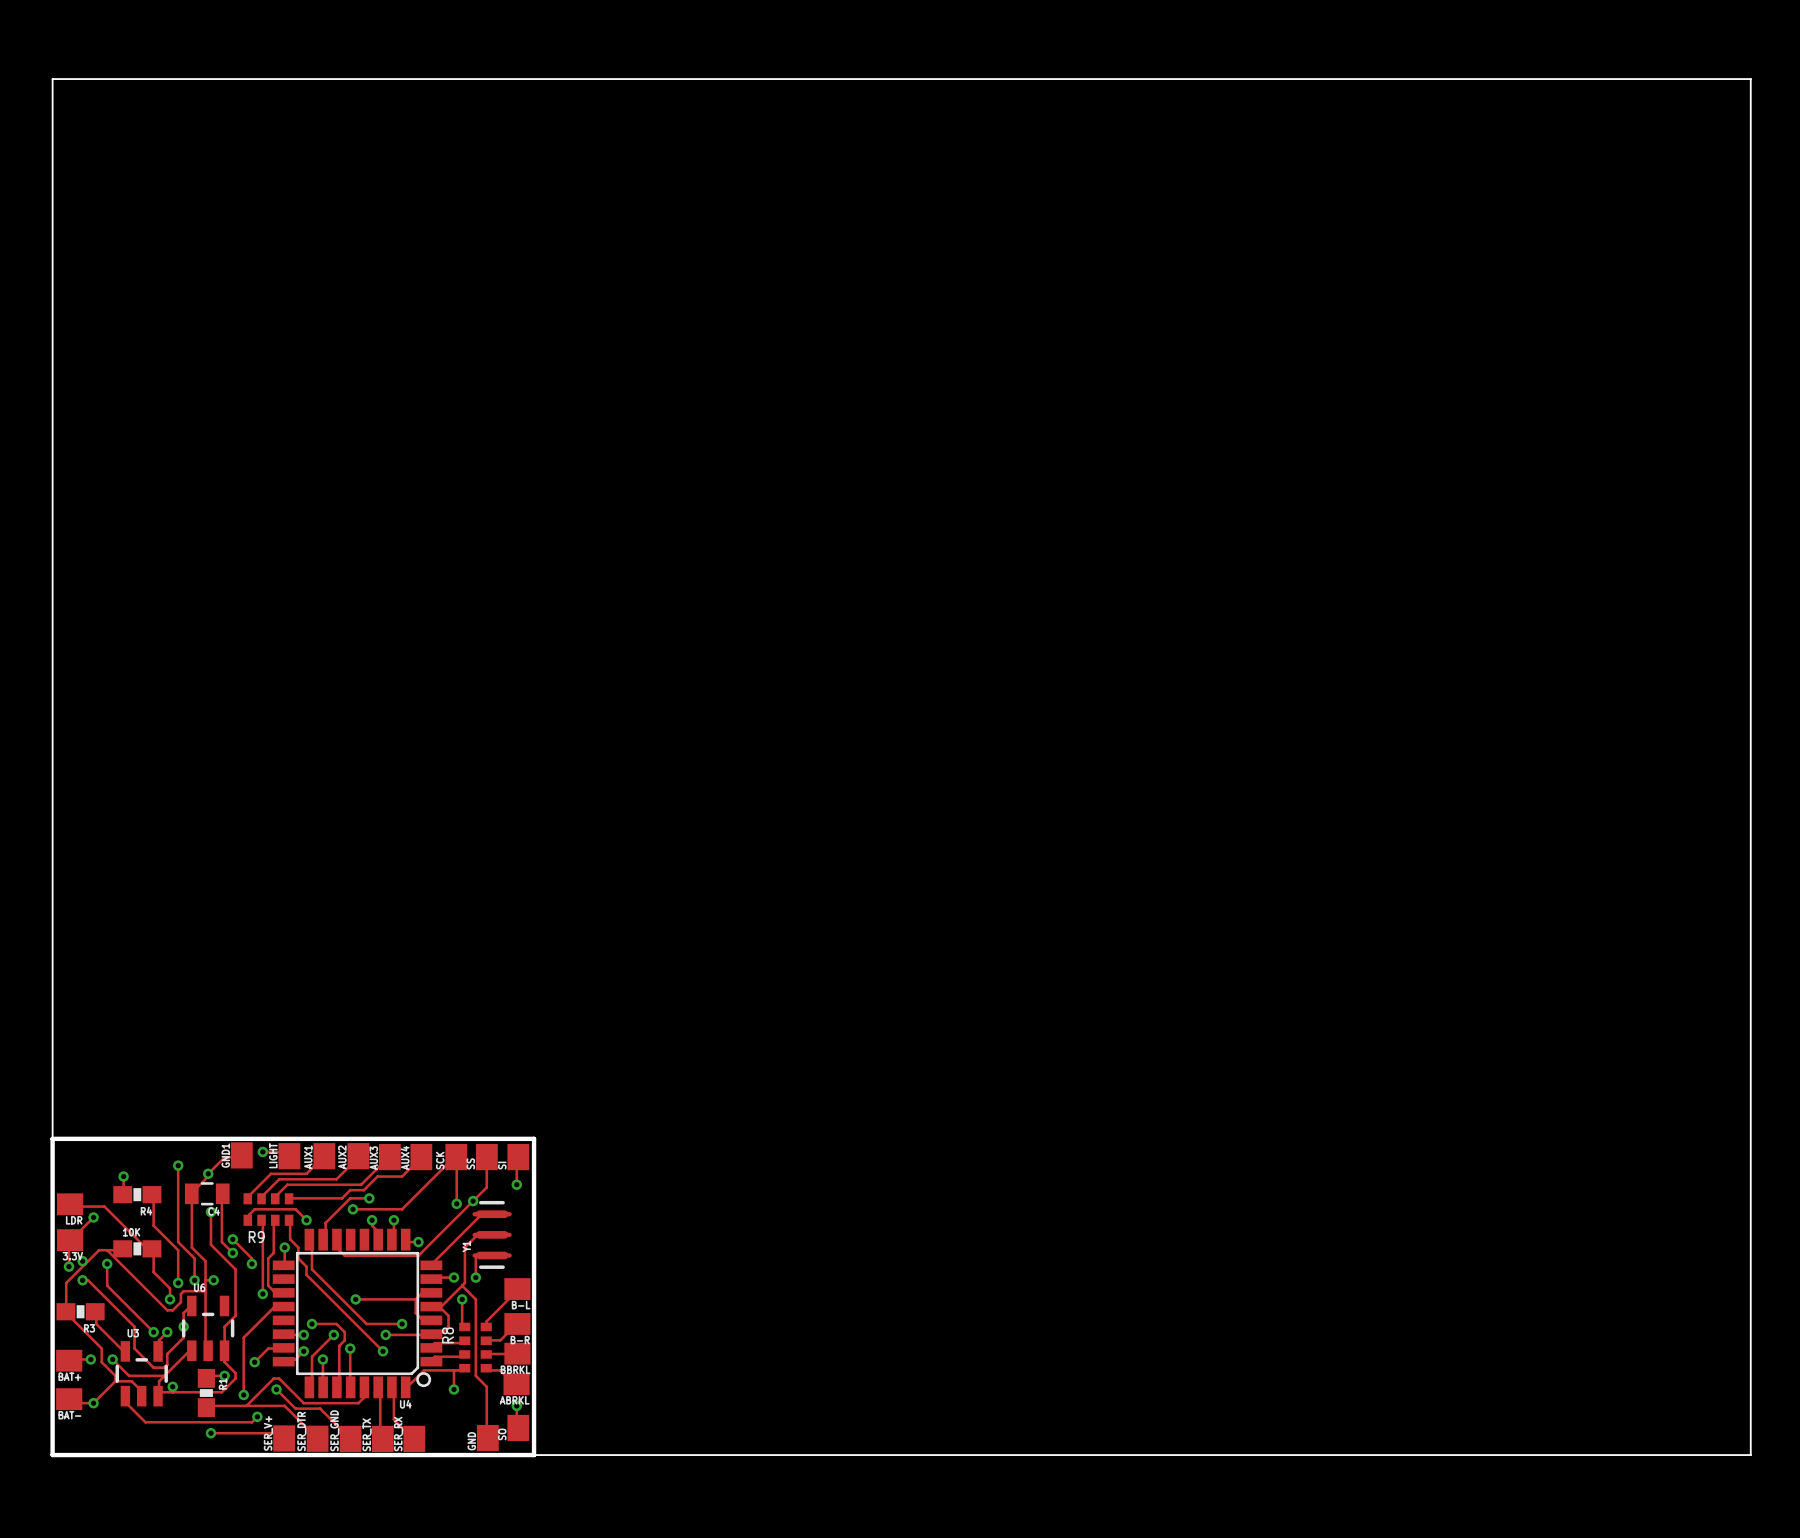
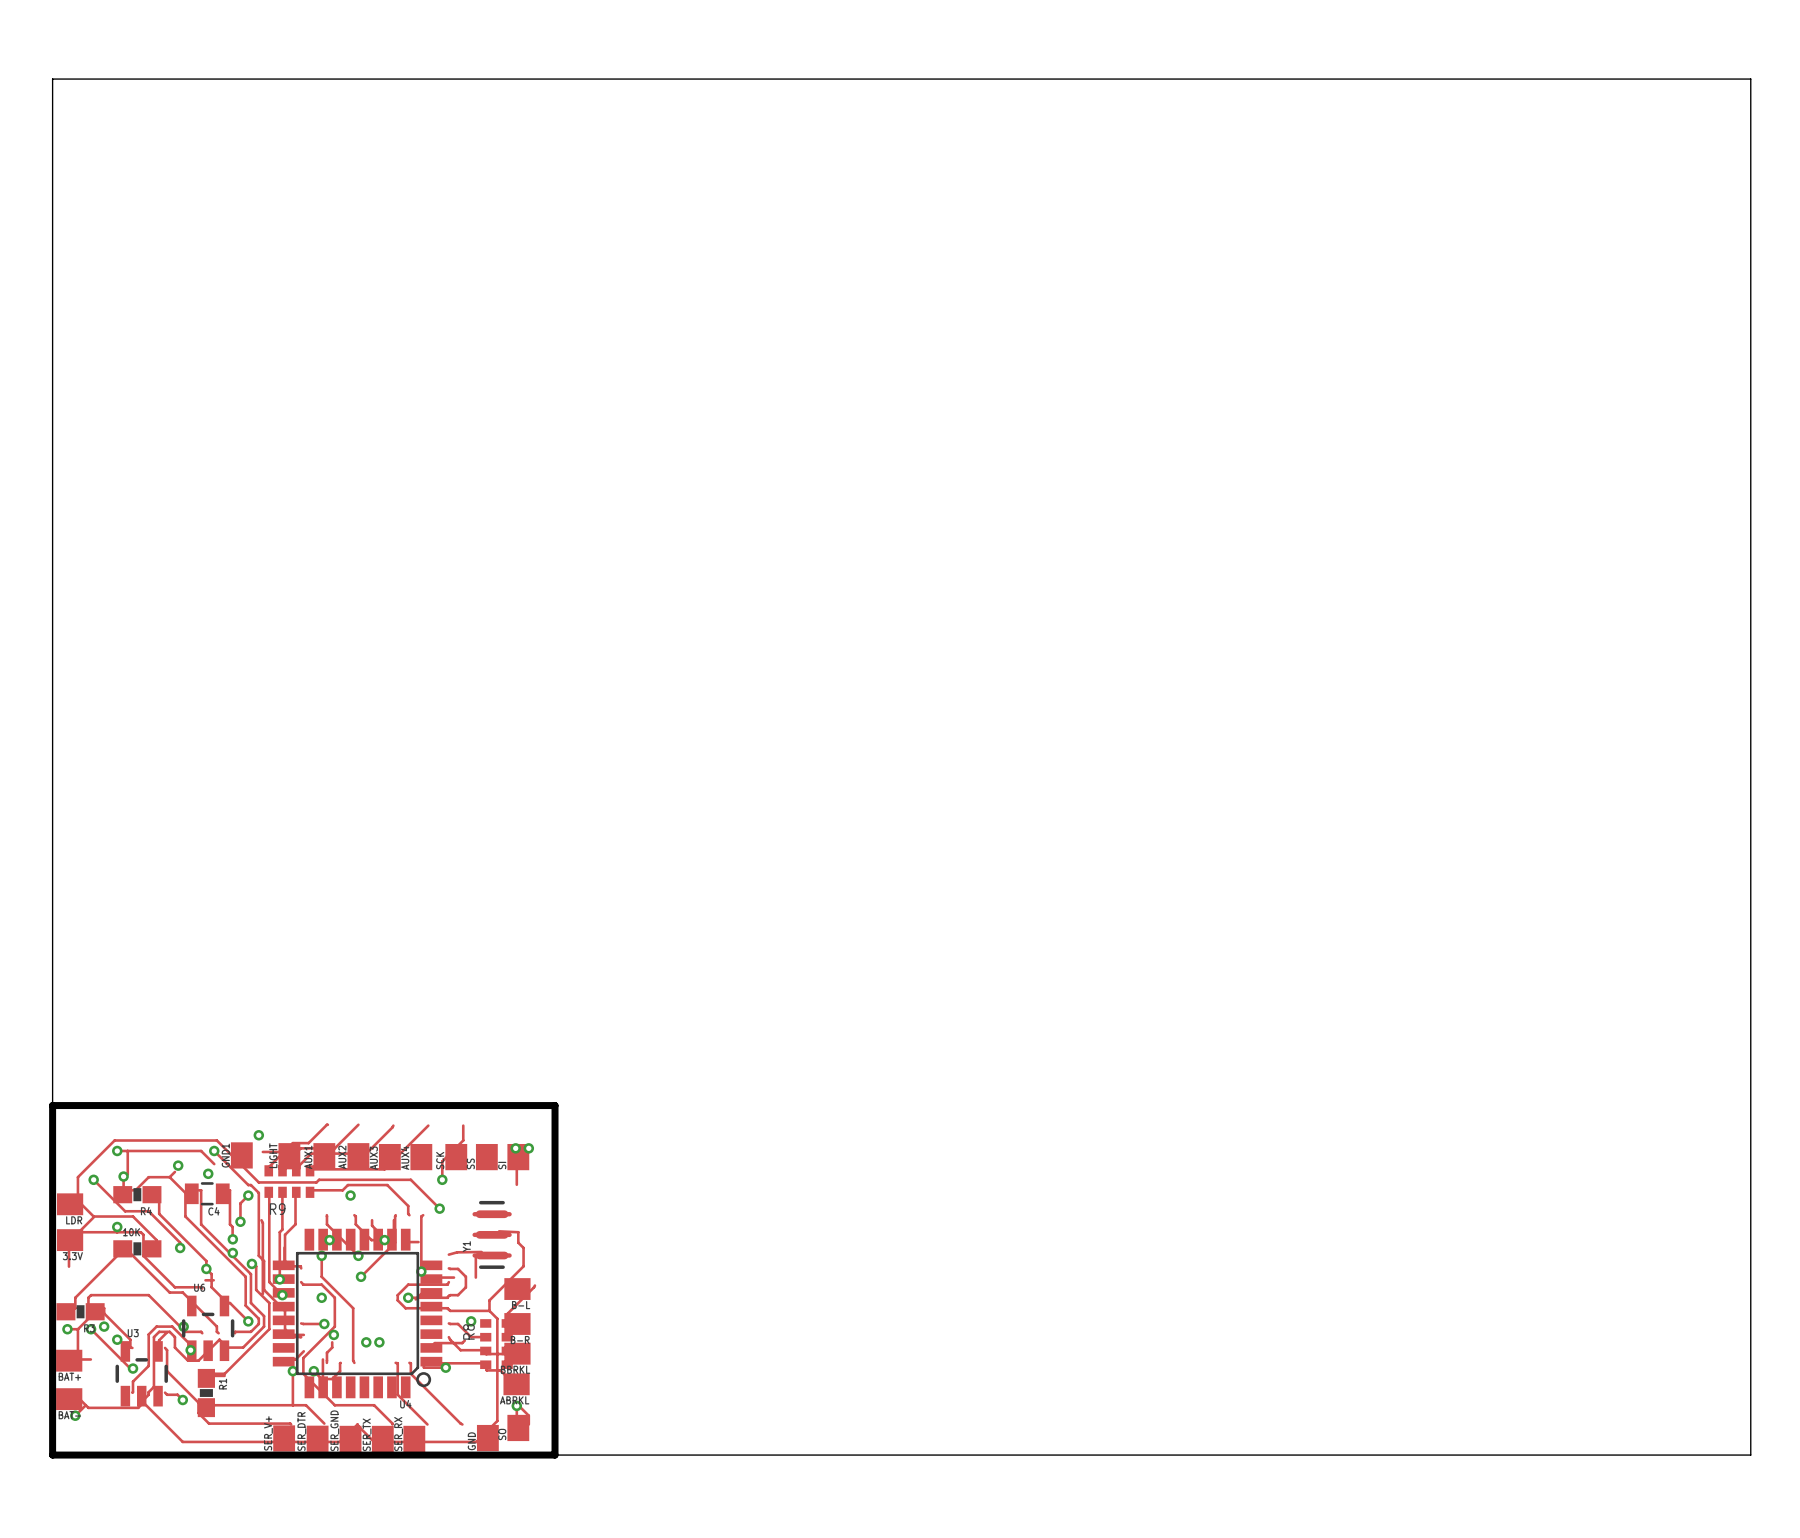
board edge: none -> (52, 1105) (555, 1105) (555, 1455)
board edge width: thin (52, 1105) (52, 1455) (555, 1455) -> thick (52, 1105) (52, 1455) (555, 1455)
track: none -> (327, 1124) (308, 1143) (292, 1143) (269, 1166) (268, 1170)
track: none -> (358, 1124) (334, 1148) (300, 1148) (285, 1164) (285, 1169) (282, 1170)
track: none -> (393, 1125) (366, 1153) (311, 1153) (296, 1170)
track: none -> (428, 1125) (384, 1169) (310, 1170)
track: none -> (463, 1125) (463, 1140) (442, 1161) (442, 1179)
board edge: (52, 1138) (534, 1138) (534, 1455) -> none
via: none -> (515, 1148)
via: none -> (528, 1148)
track: none -> (117, 1150) (201, 1150) (214, 1164)
via: none -> (117, 1150)
track: none -> (127, 1150) (127, 1174)
track: none -> (214, 1150) (258, 1192) (258, 1255) (264, 1261) (264, 1289) (285, 1310) (285, 1329) (292, 1337) (301, 1337)
via: none -> (214, 1150)
via position: (262, 1151) -> (258, 1135)
track: (241, 1155) (241, 1157) (224, 1157) (191, 1192) (191, 1247) (205, 1261) (205, 1348) (208, 1350) -> none
track: (324, 1156) (306, 1173) (271, 1173) (247, 1198) -> none
track: (358, 1156) (336, 1179) (279, 1179) (261, 1198) -> none
track: (389, 1157) (361, 1184) (287, 1184) (275, 1198) -> none
track: (421, 1157) (402, 1176) (377, 1176) (363, 1190) (350, 1190) (342, 1198) (289, 1198) -> none
track: (486, 1157) (486, 1187) (418, 1255) (344, 1255) (339, 1250) (339, 1242) (336, 1239) -> none
track: (178, 1165) (178, 1242) (194, 1258) (194, 1280) -> none
track: none -> (174, 1171) (169, 1177)
track: none -> (169, 1177) (148, 1177) (135, 1190) (129, 1191)
track: none -> (169, 1177) (185, 1192) (185, 1216) (245, 1276) (245, 1305) (258, 1318) (258, 1323) (250, 1331) (234, 1333)
track: none -> (93, 1179) (125, 1211) (148, 1211) (180, 1242) (180, 1247)
via: none -> (93, 1179)
via: none -> (442, 1179)
via: (516, 1184) -> none
track: none -> (198, 1190) (201, 1190) (201, 1224) (250, 1274) (250, 1303) (264, 1316) (264, 1326) (243, 1347) (227, 1347) (219, 1339) (198, 1360) (188, 1360) (174, 1347) (174, 1337) (169, 1331) (159, 1331) (153, 1337) (153, 1386) (143, 1402)
track: none -> (229, 1190) (229, 1224) (232, 1227) (232, 1234)
track: none -> (158, 1191) (159, 1213) (206, 1261) (206, 1268) (211, 1274) (211, 1287) (248, 1321)
track: none -> (268, 1192) (269, 1282) (282, 1295)
track: none -> (282, 1192) (279, 1279)
track: none -> (296, 1192) (295, 1224) (285, 1234) (285, 1261) (290, 1266) (300, 1266) (301, 1268)
track: none -> (310, 1192) (311, 1190) (342, 1190) (347, 1185) (387, 1185) (408, 1206) (409, 1215)
track: (222, 1193) (221, 1242) (232, 1252) -> none
track: (151, 1194) (153, 1195) (153, 1225) (178, 1250) (178, 1283) -> none
track: none -> (248, 1195) (240, 1203) (240, 1221)
via: none -> (248, 1195)
via: none -> (350, 1195)
track: (369, 1198) (350, 1198) (325, 1222) (325, 1239) (323, 1239) -> none
via: (369, 1198) -> none
track: none -> (77, 1200) (93, 1216) (132, 1216) (156, 1240) (156, 1245) (158, 1245)
track: none -> (77, 1200) (77, 1177) (114, 1140) (216, 1140) (258, 1182) (316, 1182) (319, 1179) (410, 1179) (439, 1208)
via: (473, 1201) -> none
track: (456, 1203) (456, 1157) (402, 1209) (352, 1209) -> none
via: (456, 1203) -> none
track: (70, 1204) (71, 1206) (104, 1206) (145, 1247) (150, 1247) (153, 1250) (153, 1272) (170, 1288) (170, 1299) -> none
via: none -> (439, 1208)
R9 position: (268, 1209) -> (289, 1181)
via: (352, 1209) -> none
track: (210, 1212) (210, 1244) (235, 1269) (235, 1315) (224, 1326) (224, 1350) (224, 1362) (235, 1373) (235, 1378) (221, 1392) (159, 1392) (158, 1396) (159, 1381) (191, 1350) -> none
via: (210, 1212) -> none
track: (492, 1214) (481, 1214) (431, 1265) -> none
track: none -> (326, 1215) (326, 1224) (358, 1255)
track: none -> (354, 1215) (355, 1224) (371, 1240) (384, 1240)
track: none -> (395, 1215) (395, 1242) (361, 1276)
track: none -> (423, 1215) (421, 1216) (421, 1271)
via: (93, 1217) -> none
track: (247, 1220) (249, 1214) (254, 1209) (295, 1209) (306, 1220) -> none
track: (275, 1220) (273, 1252) (268, 1258) (268, 1285) (273, 1291) (283, 1292) -> none
track: (289, 1220) (290, 1239) (298, 1247) (298, 1258) (306, 1266) (306, 1274) (382, 1351) -> none
via: (306, 1220) -> none
via: (372, 1220) -> none
via: (393, 1220) -> none
via: none -> (240, 1221)
via: none -> (117, 1227)
track: none -> (499, 1231) (518, 1232) (518, 1242) (523, 1247) (523, 1266) (489, 1300) (489, 1310)
track: (474, 1234) (475, 1236) (464, 1247) (464, 1283) (440, 1307) (448, 1315) (448, 1326) (443, 1332) (432, 1332) (429, 1334) (385, 1334) -> none
track: none -> (77, 1236) (80, 1232) (140, 1232) (143, 1234) (143, 1255) (174, 1287) (202, 1288)
track: (232, 1239) (251, 1258) (251, 1263) -> none
track: (309, 1239) (312, 1242) (312, 1269) (366, 1323) (402, 1323) -> none
via: none -> (329, 1240)
via: none -> (384, 1240)
via: (418, 1242) -> none
via: none -> (180, 1247)
via: (284, 1247) -> none
track: (122, 1248) (99, 1250) (66, 1283) (66, 1313) (101, 1348) (101, 1362) (115, 1375) (115, 1381) -> none
track: (107, 1250) (167, 1310) (172, 1310) (180, 1302) (180, 1293) (183, 1291) (205, 1291) -> none
track: none -> (481, 1252) (457, 1252) (448, 1254)
track: none -> (321, 1255) (321, 1276) (353, 1308) (354, 1362)
via: none -> (321, 1255)
via: none -> (358, 1255)
via: (82, 1261) -> none
track: (107, 1263) (107, 1285) (153, 1332) -> none
via: (107, 1263) -> none
track: none -> (253, 1263) (256, 1266) (256, 1289) (269, 1303) (269, 1329) (224, 1373) (213, 1374)
via: (68, 1266) -> none
via: none -> (206, 1268)
track: none -> (448, 1268) (458, 1268) (465, 1276) (465, 1287) (458, 1295) (450, 1295) (447, 1297) (408, 1297)
via: none -> (421, 1271)
via: none -> (361, 1276)
via: (453, 1277) -> none
via: (475, 1277) -> none
via: none -> (279, 1279)
track: (82, 1280) (88, 1280) (134, 1326) (134, 1348) (153, 1367) (164, 1367) (167, 1364) (167, 1354) (183, 1337) (183, 1313) (191, 1305) -> none
via: (82, 1280) -> none
via: (194, 1280) -> none
via: (213, 1280) -> none
track: none -> (301, 1282) (303, 1284) (321, 1284) (334, 1297) (334, 1326) (303, 1358) (303, 1373) (334, 1405) (374, 1405) (392, 1424)
track: none -> (448, 1282) (447, 1284) (408, 1284) (397, 1295) (397, 1300) (405, 1308) (489, 1310)
via: (178, 1283) -> none
track: (462, 1285) (475, 1299) (475, 1375) (486, 1386) (487, 1438) -> none
track: none -> (534, 1285) (507, 1313) (507, 1323)
track: (517, 1289) (486, 1321) (486, 1326) -> none
via: (262, 1293) -> none
via: none -> (282, 1295)
via: none -> (321, 1297)
via: none -> (408, 1297)
via: (170, 1299) -> none
track: (355, 1299) (415, 1299) (415, 1313) (421, 1318) (431, 1320) -> none
via: (355, 1299) -> none
track: (462, 1299) (462, 1326) (464, 1326) -> none
via: (462, 1299) -> none
track: (283, 1306) (273, 1307) (243, 1337) (243, 1394) -> none
track: none -> (72, 1308) (75, 1308) (75, 1297) (127, 1245) (129, 1245) (125, 1247) (169, 1292) (182, 1292) (216, 1326) (218, 1333)
track: none -> (102, 1308) (104, 1308) (104, 1313) (130, 1339) (130, 1347) (132, 1347)
track: none -> (489, 1310) (497, 1318) (497, 1420) (476, 1441) (374, 1441) (357, 1424) (340, 1441) (182, 1441) (143, 1402)
track: (95, 1311) (96, 1323) (125, 1351) -> none
via: none -> (248, 1321)
via: none -> (471, 1321)
track: none -> (301, 1323) (312, 1323)
via: (312, 1323) -> none
track: (324, 1323) (336, 1323) (344, 1332) (344, 1340) (339, 1345) (339, 1386) (336, 1387) -> none
via: none -> (324, 1323)
via: (402, 1323) -> none
track: none -> (448, 1323) (458, 1323) (471, 1337) (485, 1337)
track: (517, 1323) (500, 1340) (486, 1340) -> none
via: none -> (104, 1326)
track: none -> (67, 1329) (77, 1329)
via: none -> (67, 1329)
track: none -> (77, 1329) (77, 1355) (76, 1357)
track: none -> (77, 1329) (88, 1318) (88, 1297) (91, 1295) (148, 1295) (185, 1331) (202, 1333)
track: none -> (91, 1329) (130, 1368) (132, 1368)
via: none -> (91, 1329)
via: (153, 1332) -> none
via: (167, 1332) -> none
via: (303, 1334) -> none
track: (333, 1334) (312, 1356) (312, 1386) (309, 1387) -> none
via: (385, 1334) -> none
track: none -> (448, 1337) (460, 1350) (485, 1350)
via: none -> (117, 1339)
track: none -> (332, 1342) (332, 1347) (326, 1352) (326, 1362)
via: none -> (366, 1342)
via: none -> (379, 1342)
track: none -> (165, 1347) (167, 1350) (167, 1371) (198, 1402) (198, 1413) (209, 1423) (291, 1424)
track: (283, 1347) (268, 1348) (254, 1362) -> none
R8 position: (475, 1347) -> (496, 1344)
track: (350, 1348) (350, 1387) -> none
via: (350, 1348) -> none
track: none -> (190, 1350) (190, 1344) (172, 1326) (156, 1326) (148, 1334) (148, 1365) (132, 1381) (132, 1392)
via: none -> (190, 1350)
via: (303, 1351) -> none
via: (382, 1351) -> none
track: (464, 1354) (462, 1356) (434, 1356) (431, 1361) -> none
via: (90, 1359) -> none
track: (112, 1359) (129, 1375) (164, 1375) -> none
via: (112, 1359) -> none
via: (322, 1359) -> none
via: (254, 1362) -> none
track: none -> (340, 1362) (340, 1371) (332, 1379) (321, 1379) (313, 1371)
track: none -> (395, 1362) (397, 1363) (397, 1394) (427, 1424)
track: none -> (409, 1362) (410, 1373) (462, 1424)
track: none -> (485, 1364) (423, 1362) (423, 1367) (445, 1367)
via: none -> (132, 1368)
track: (464, 1368) (462, 1370) (423, 1370) (405, 1387) -> none
track: (453, 1370) (453, 1389) -> none
track: none -> (292, 1371) (292, 1405)
via: none -> (292, 1371)
via: none -> (313, 1371)
via: (224, 1375) -> none
track: (115, 1381) (93, 1403) (74, 1403) (69, 1399) -> none
track: (115, 1381) (131, 1381) (139, 1389) (141, 1396) -> none
via position: (172, 1386) -> (182, 1400)
track: (364, 1387) (363, 1397) (358, 1403) (303, 1403) (279, 1378) (273, 1378) (246, 1405) -> none
track: (378, 1387) (380, 1389) (380, 1438) (382, 1438) -> none
track: (391, 1387) (393, 1389) (393, 1419) (414, 1438) -> none
track: (276, 1389) (295, 1408) (320, 1408) (350, 1438) -> none
via: (276, 1389) -> none
via position: (453, 1389) -> (445, 1367)
track: none -> (165, 1392) (167, 1394) (177, 1394) (182, 1400)
via: (243, 1394) -> none
track: none -> (76, 1395) (88, 1407) (138, 1407) (143, 1402)
track: (125, 1396) (126, 1403) (145, 1422) (251, 1422) (257, 1416) -> none
track: none -> (515, 1402) (528, 1415) (528, 1424)
via position: (93, 1403) -> (75, 1415)
track: none -> (213, 1404) (305, 1405) (324, 1423)
track: none -> (85, 1405) (75, 1415)
track: (206, 1407) (208, 1405) (284, 1405) (317, 1438) -> none
via: (257, 1416) -> none
track: (210, 1433) (279, 1433) (284, 1438) -> none
via: (210, 1433) -> none

